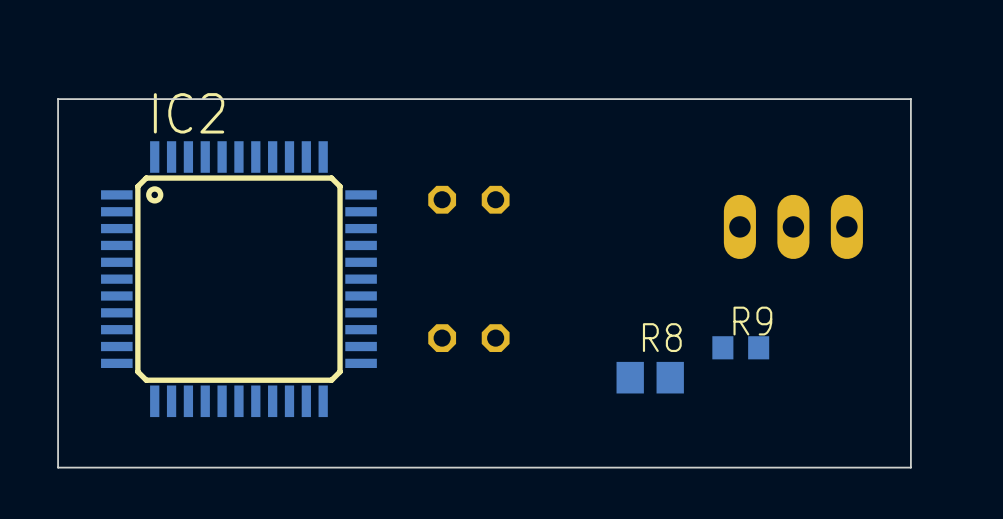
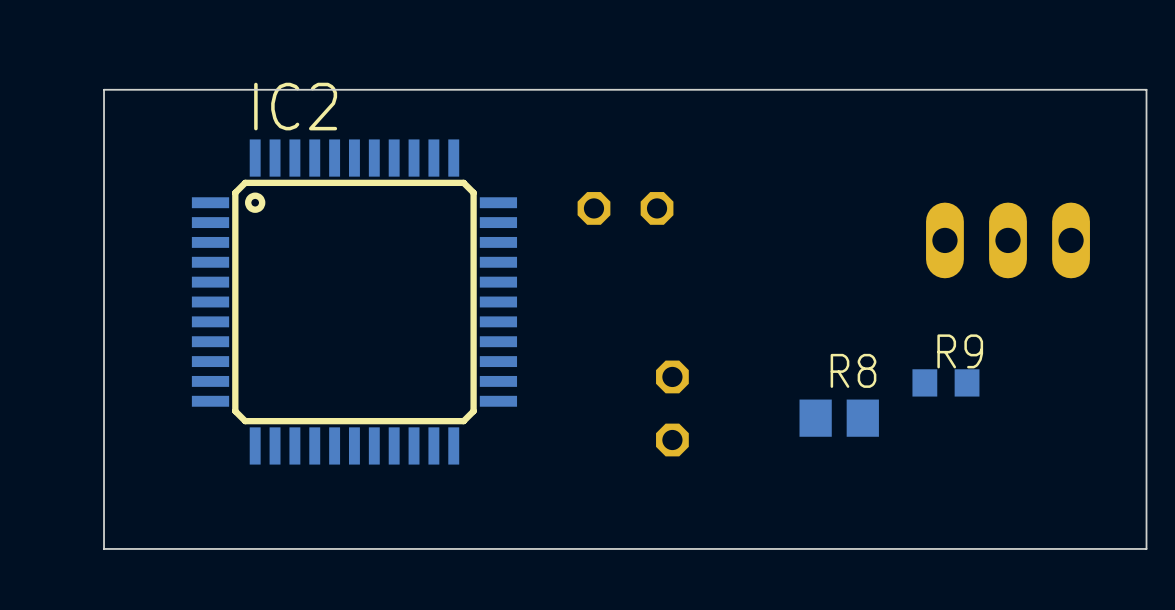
board edge: (58, 99) (58, 467) (910, 467) -> (141, 89) (104, 89) (104, 548) (1146, 548) (1146, 524)
part rotation: 0° (468, 338) -> 90° clockwise (672, 408)
part position: (468, 338) -> (672, 408)

